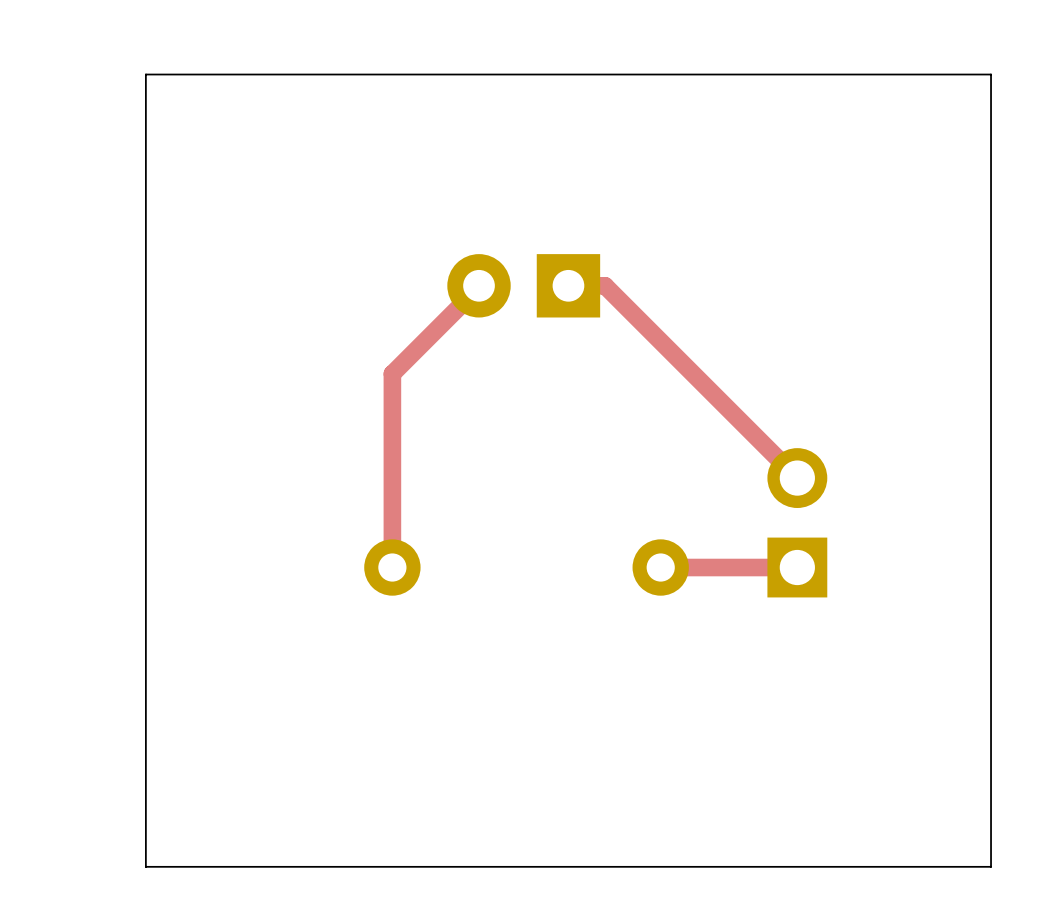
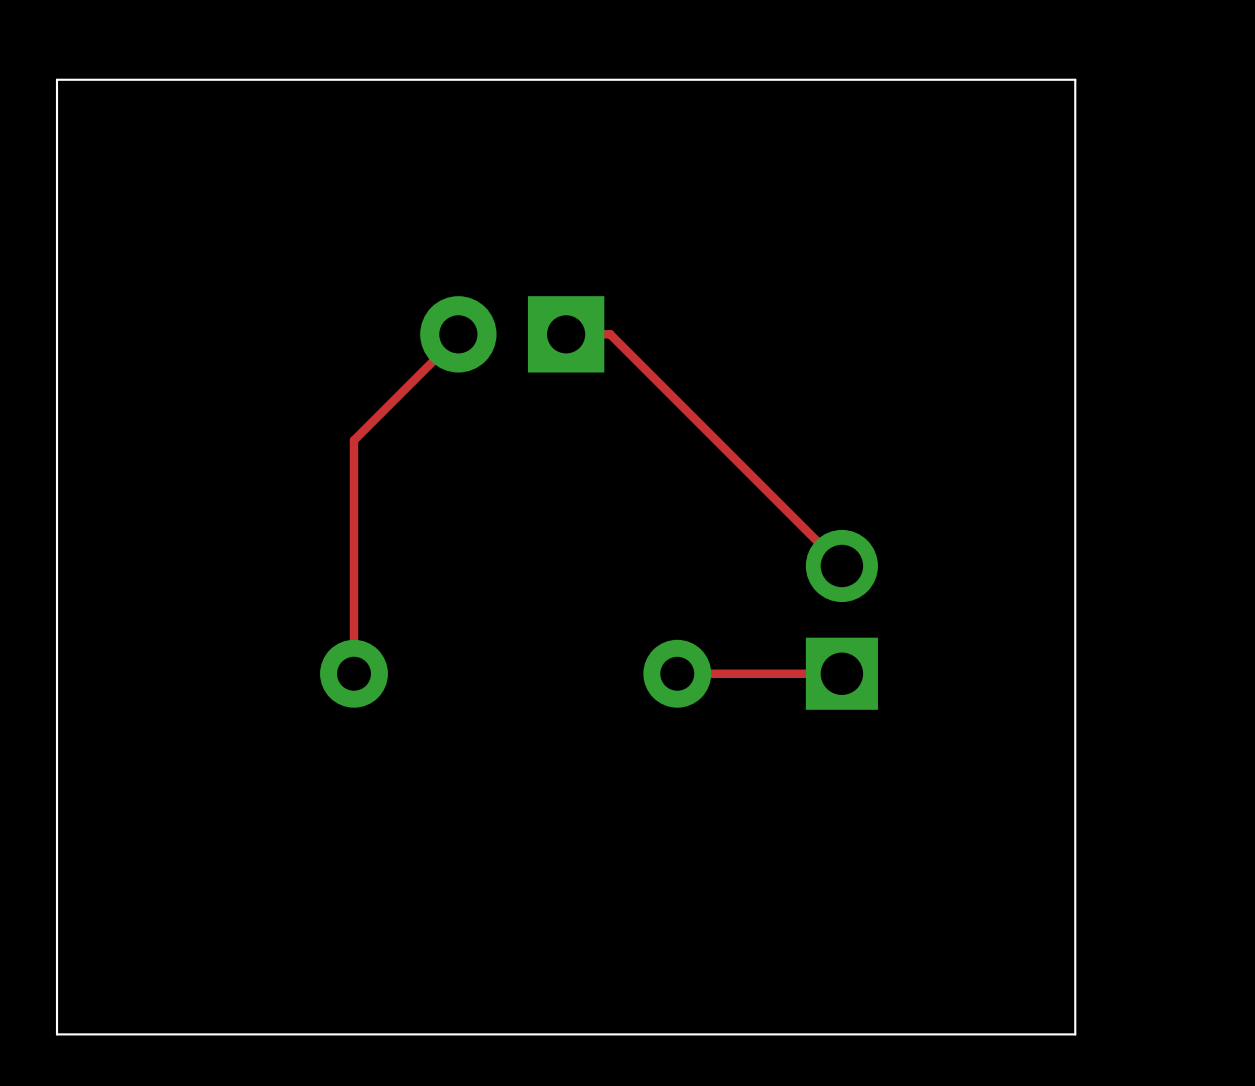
top track width: thick (480, 285) (392, 373) (392, 567) -> thin (460, 334) (353, 440) (353, 673)
top track width: thick (569, 285) (605, 285) (797, 478) -> thin (567, 334) (610, 334) (841, 565)
top track width: thick (797, 567) (660, 567) -> thin (841, 673) (677, 673)

